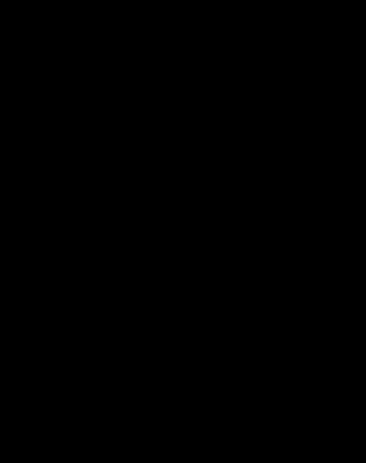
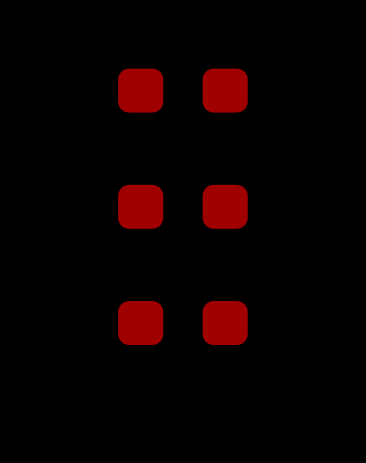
part: none -> (182, 90)
part: none -> (182, 206)
part: none -> (182, 323)

